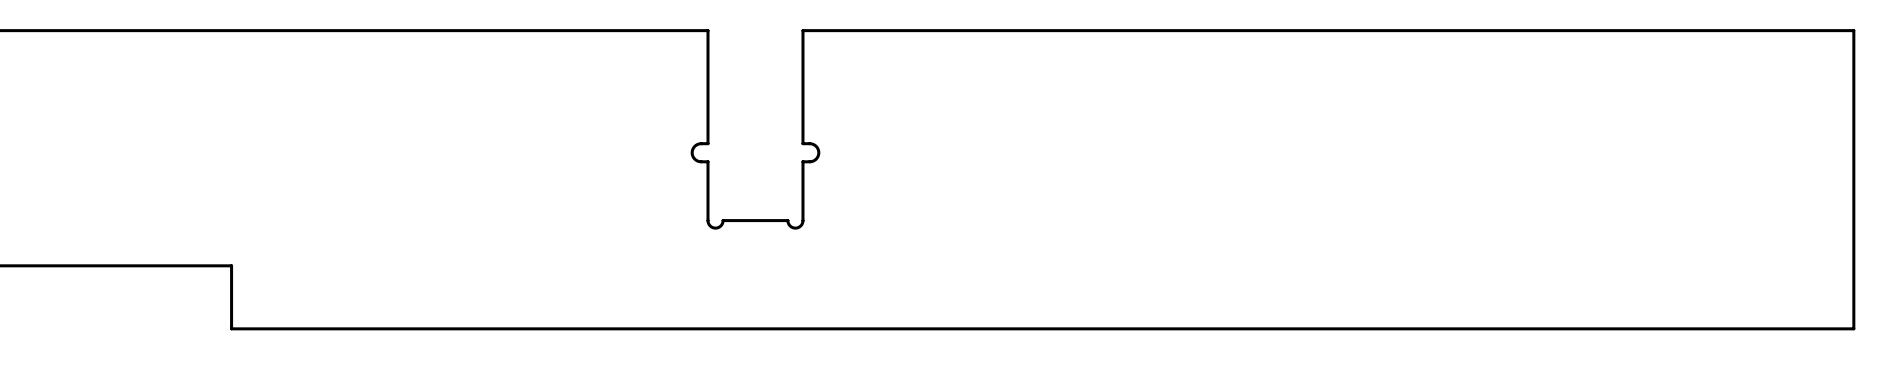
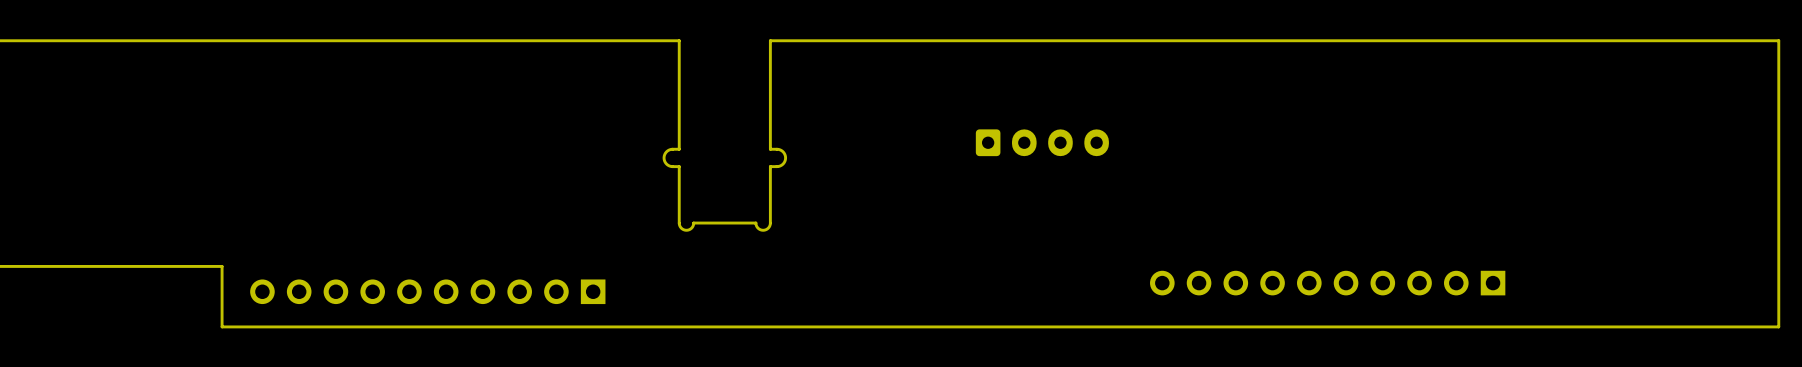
part: none -> (1042, 142)
part: none -> (1327, 283)
part: none -> (427, 291)

